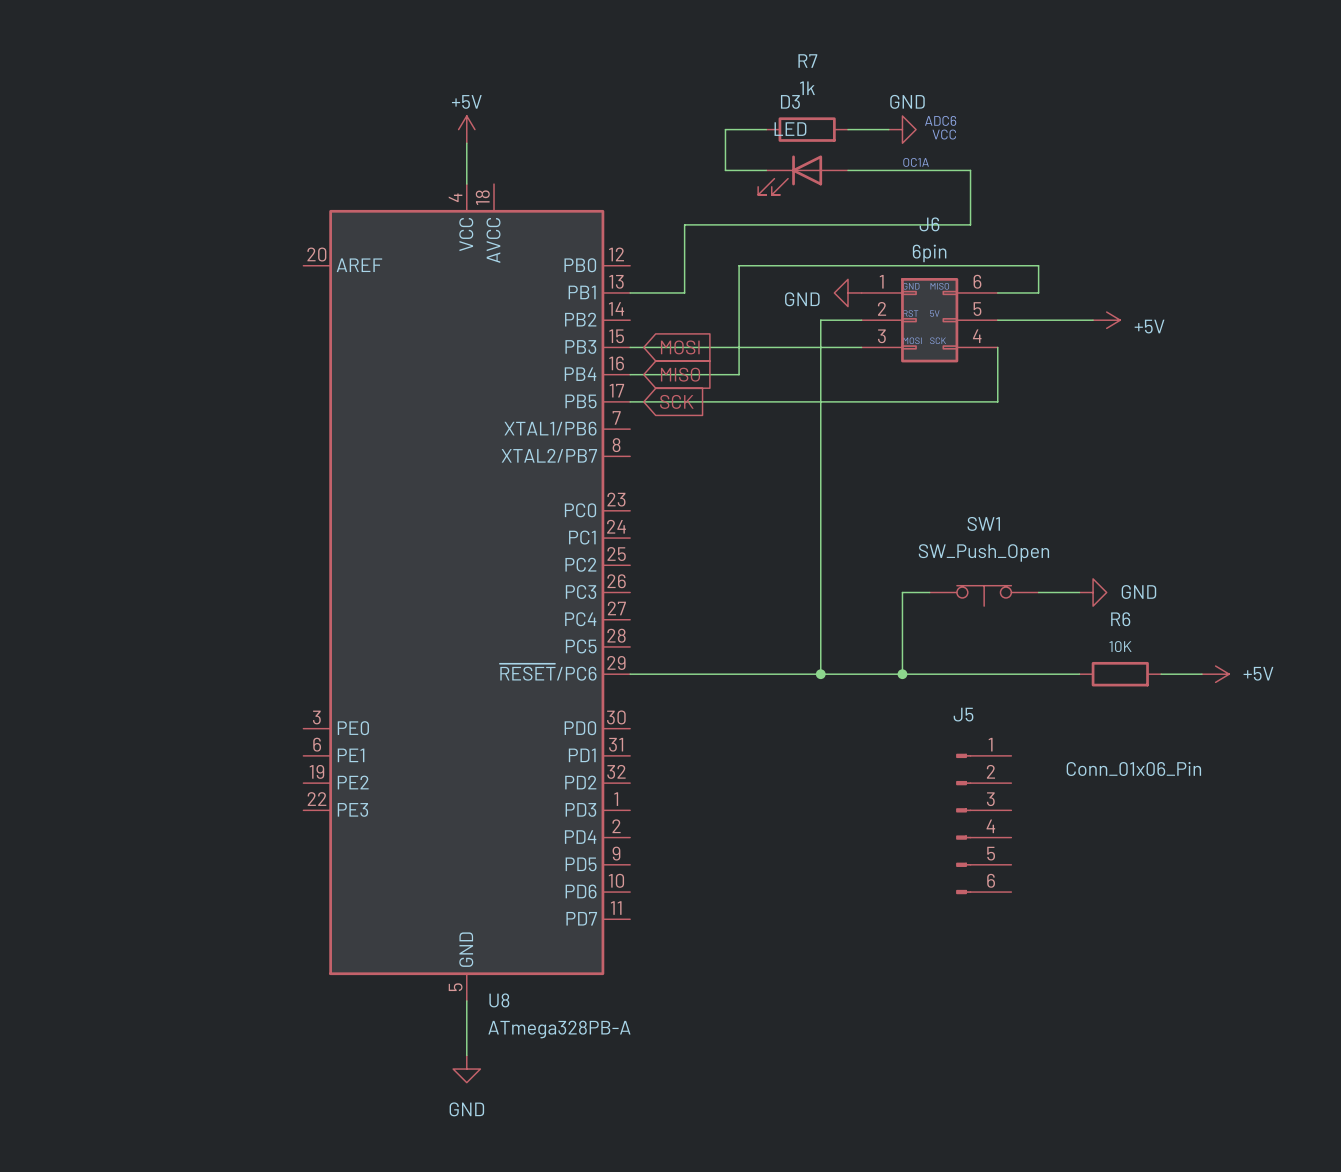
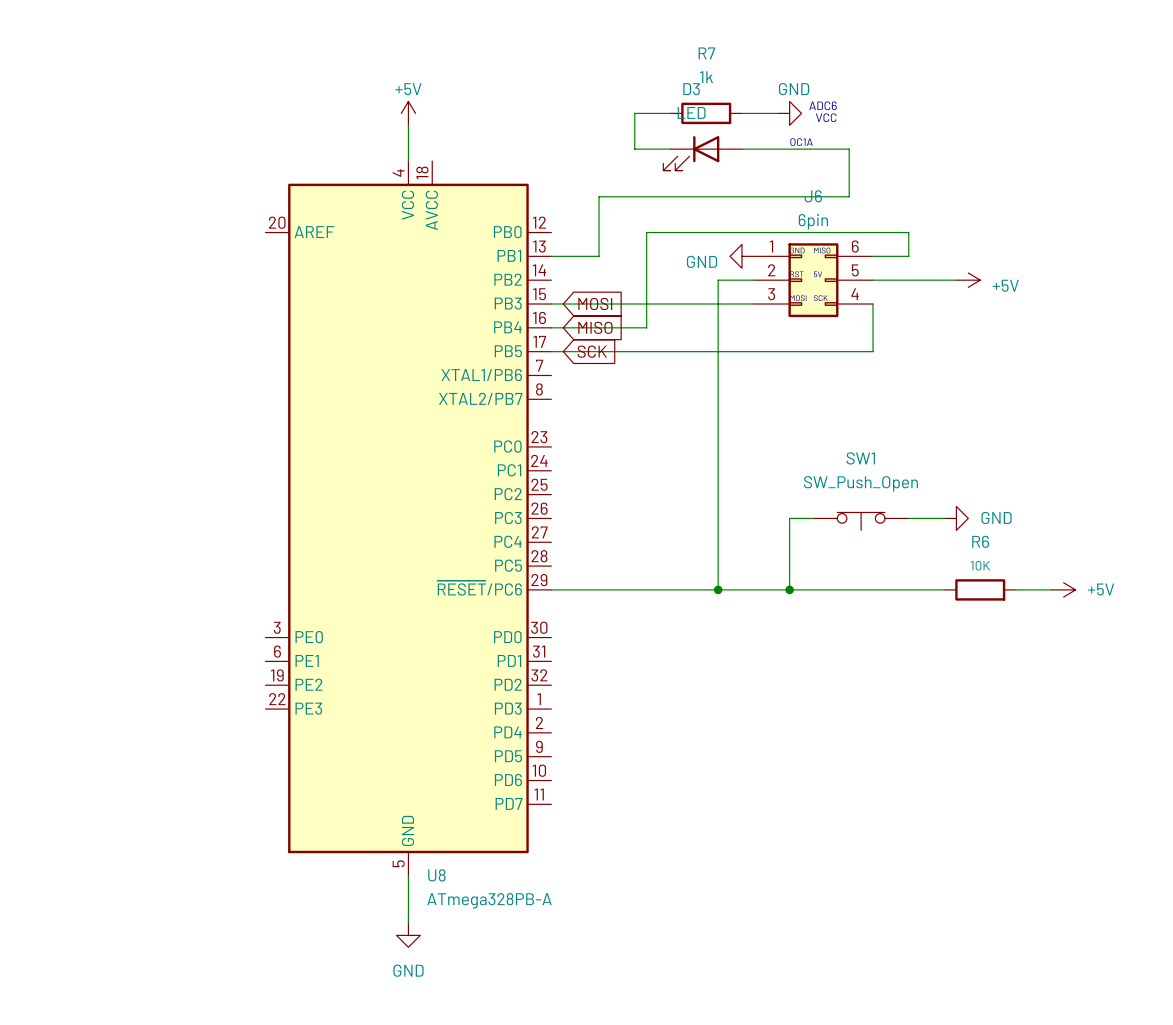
J5: Conn_01x06_Pin (983, 823) -> none

